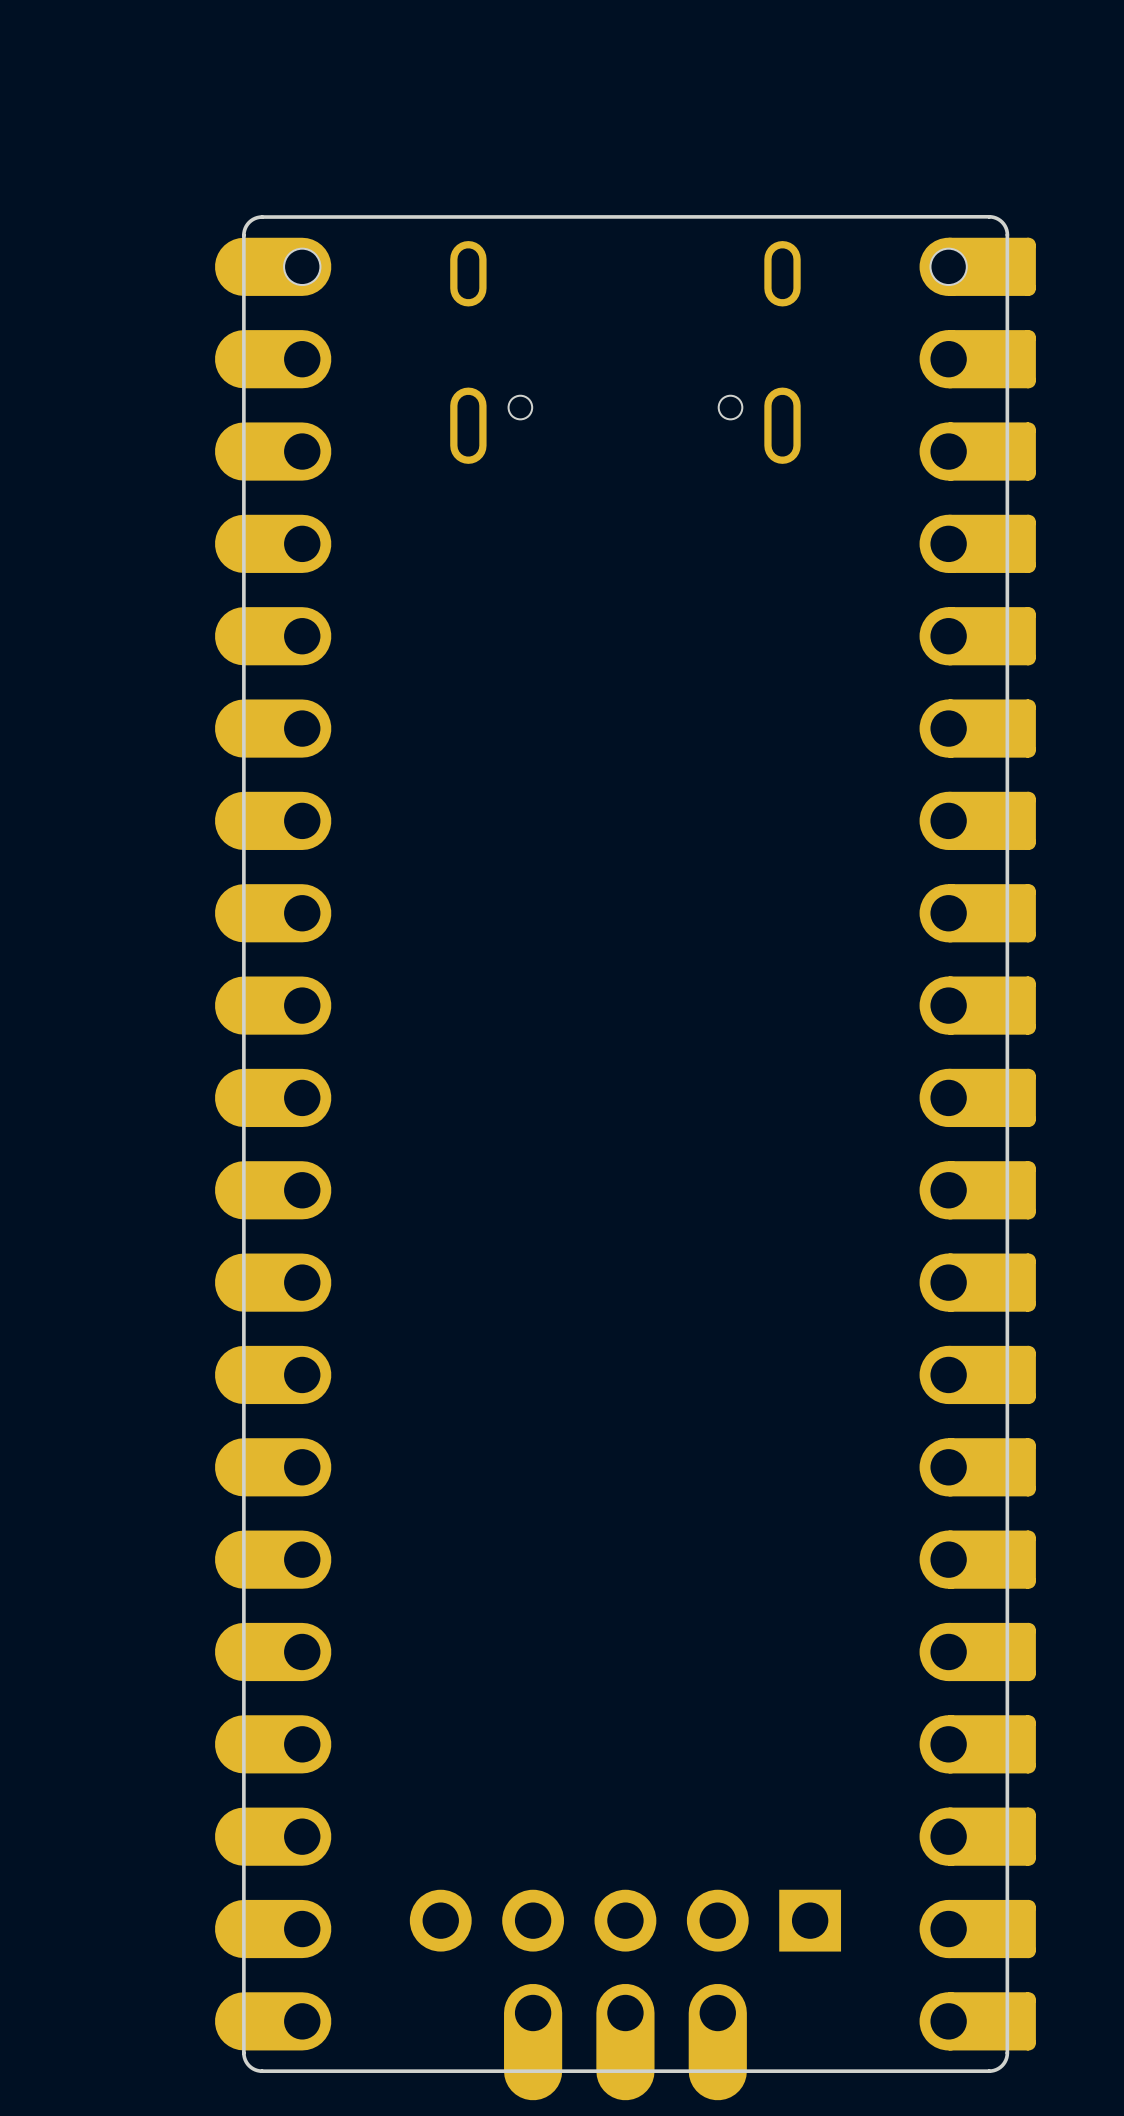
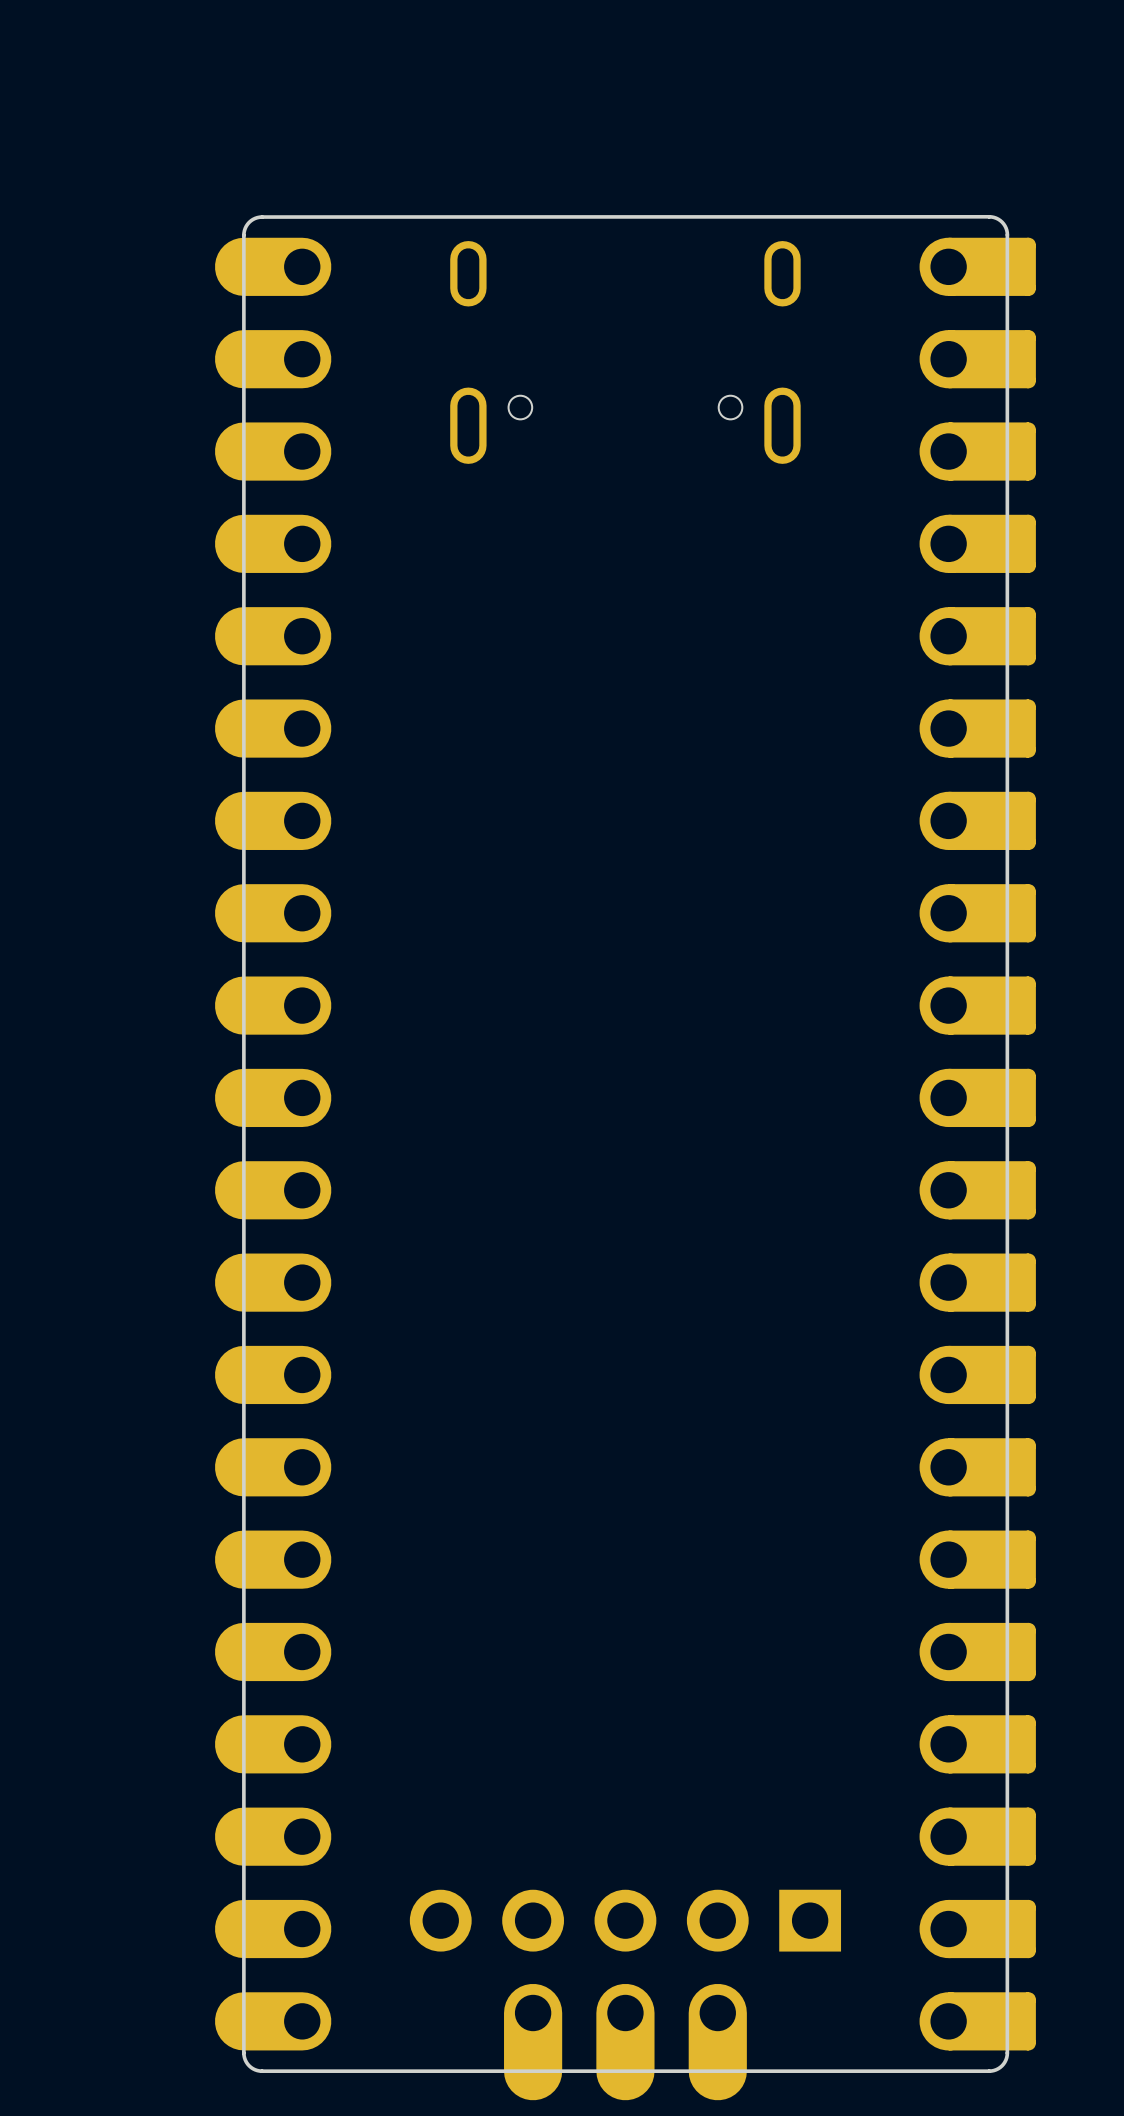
part footprint: [214, 214, 1036, 2101] -> [214, 214, 1036, 2101]

